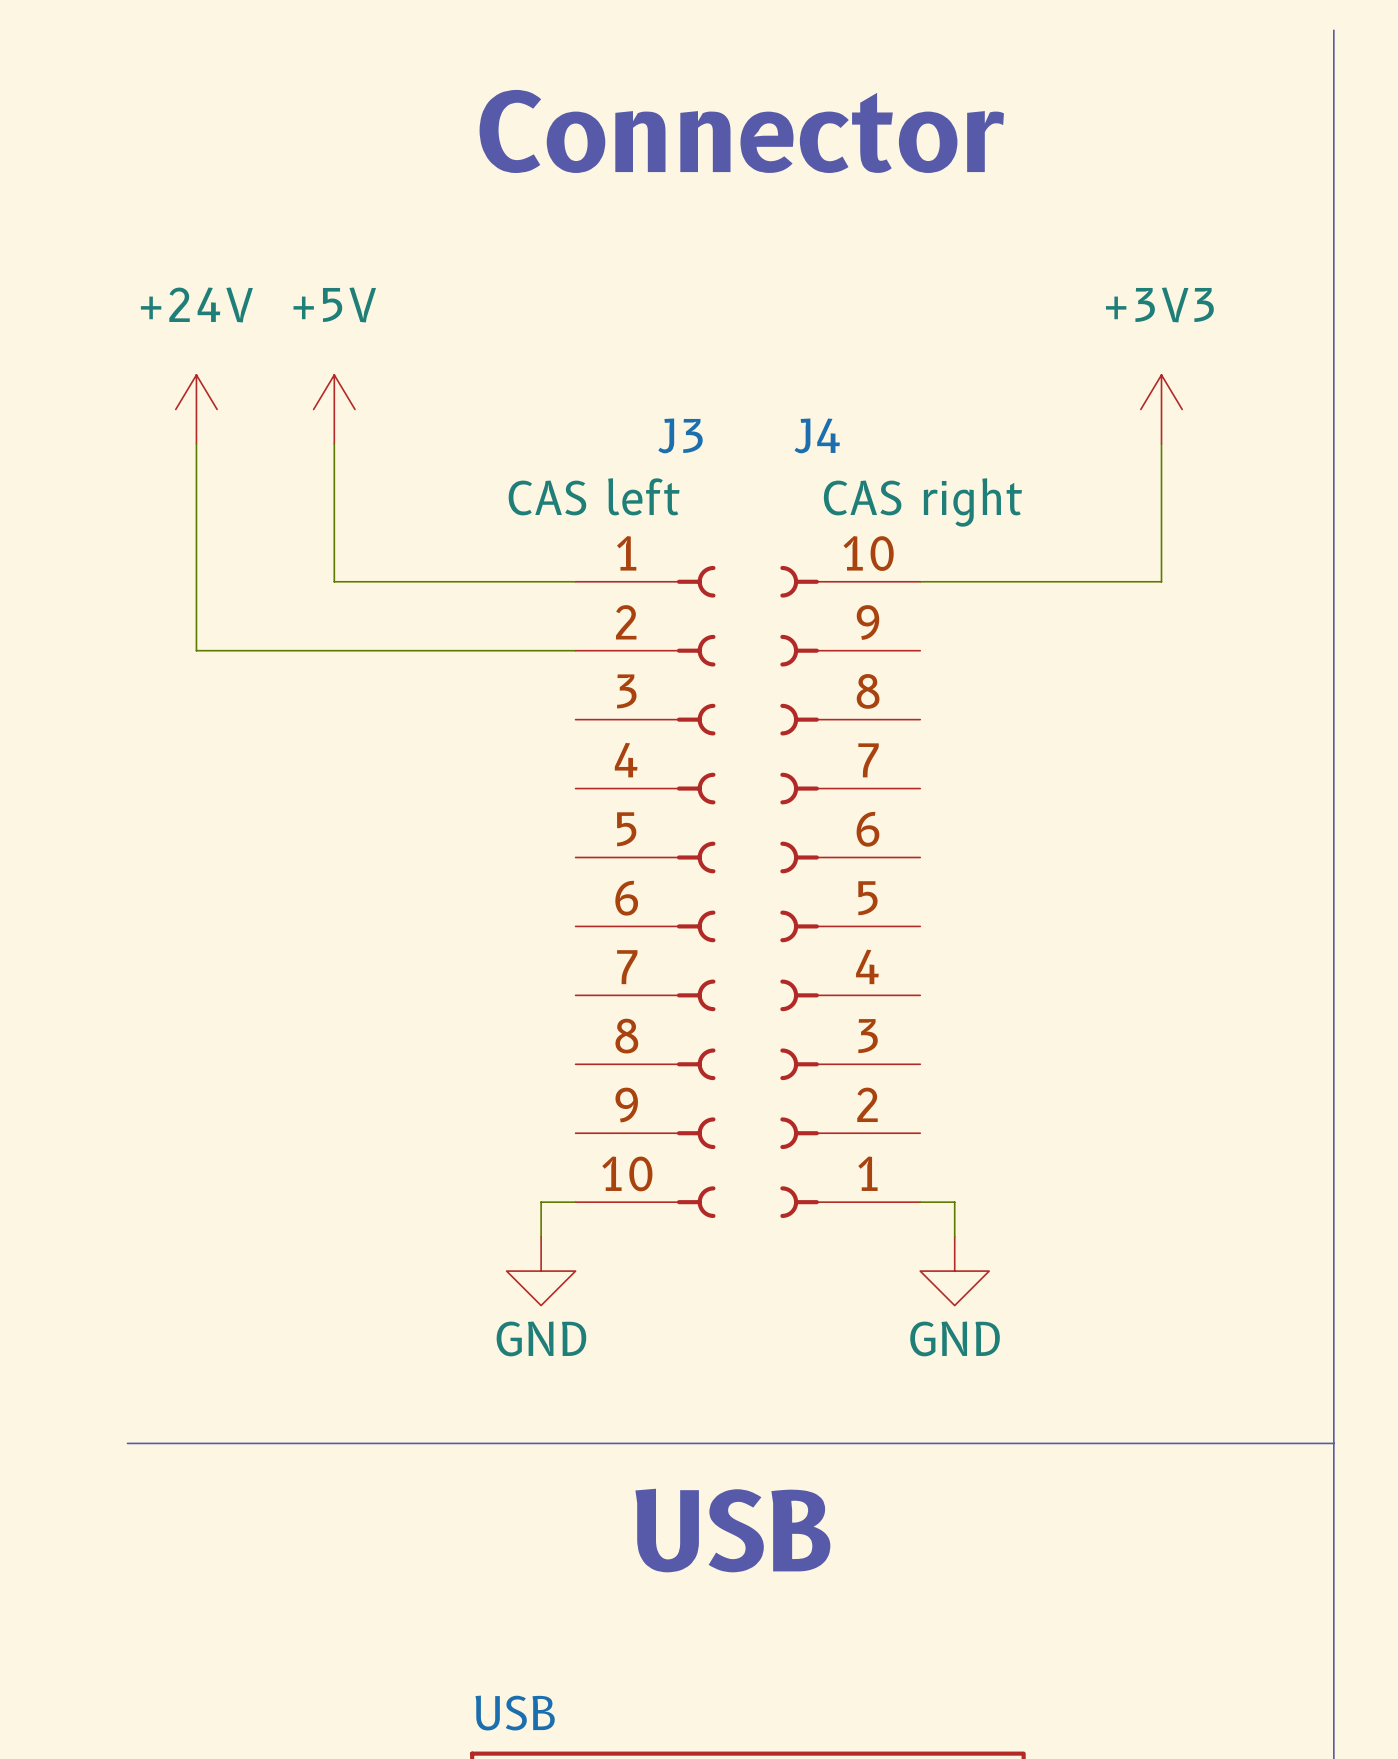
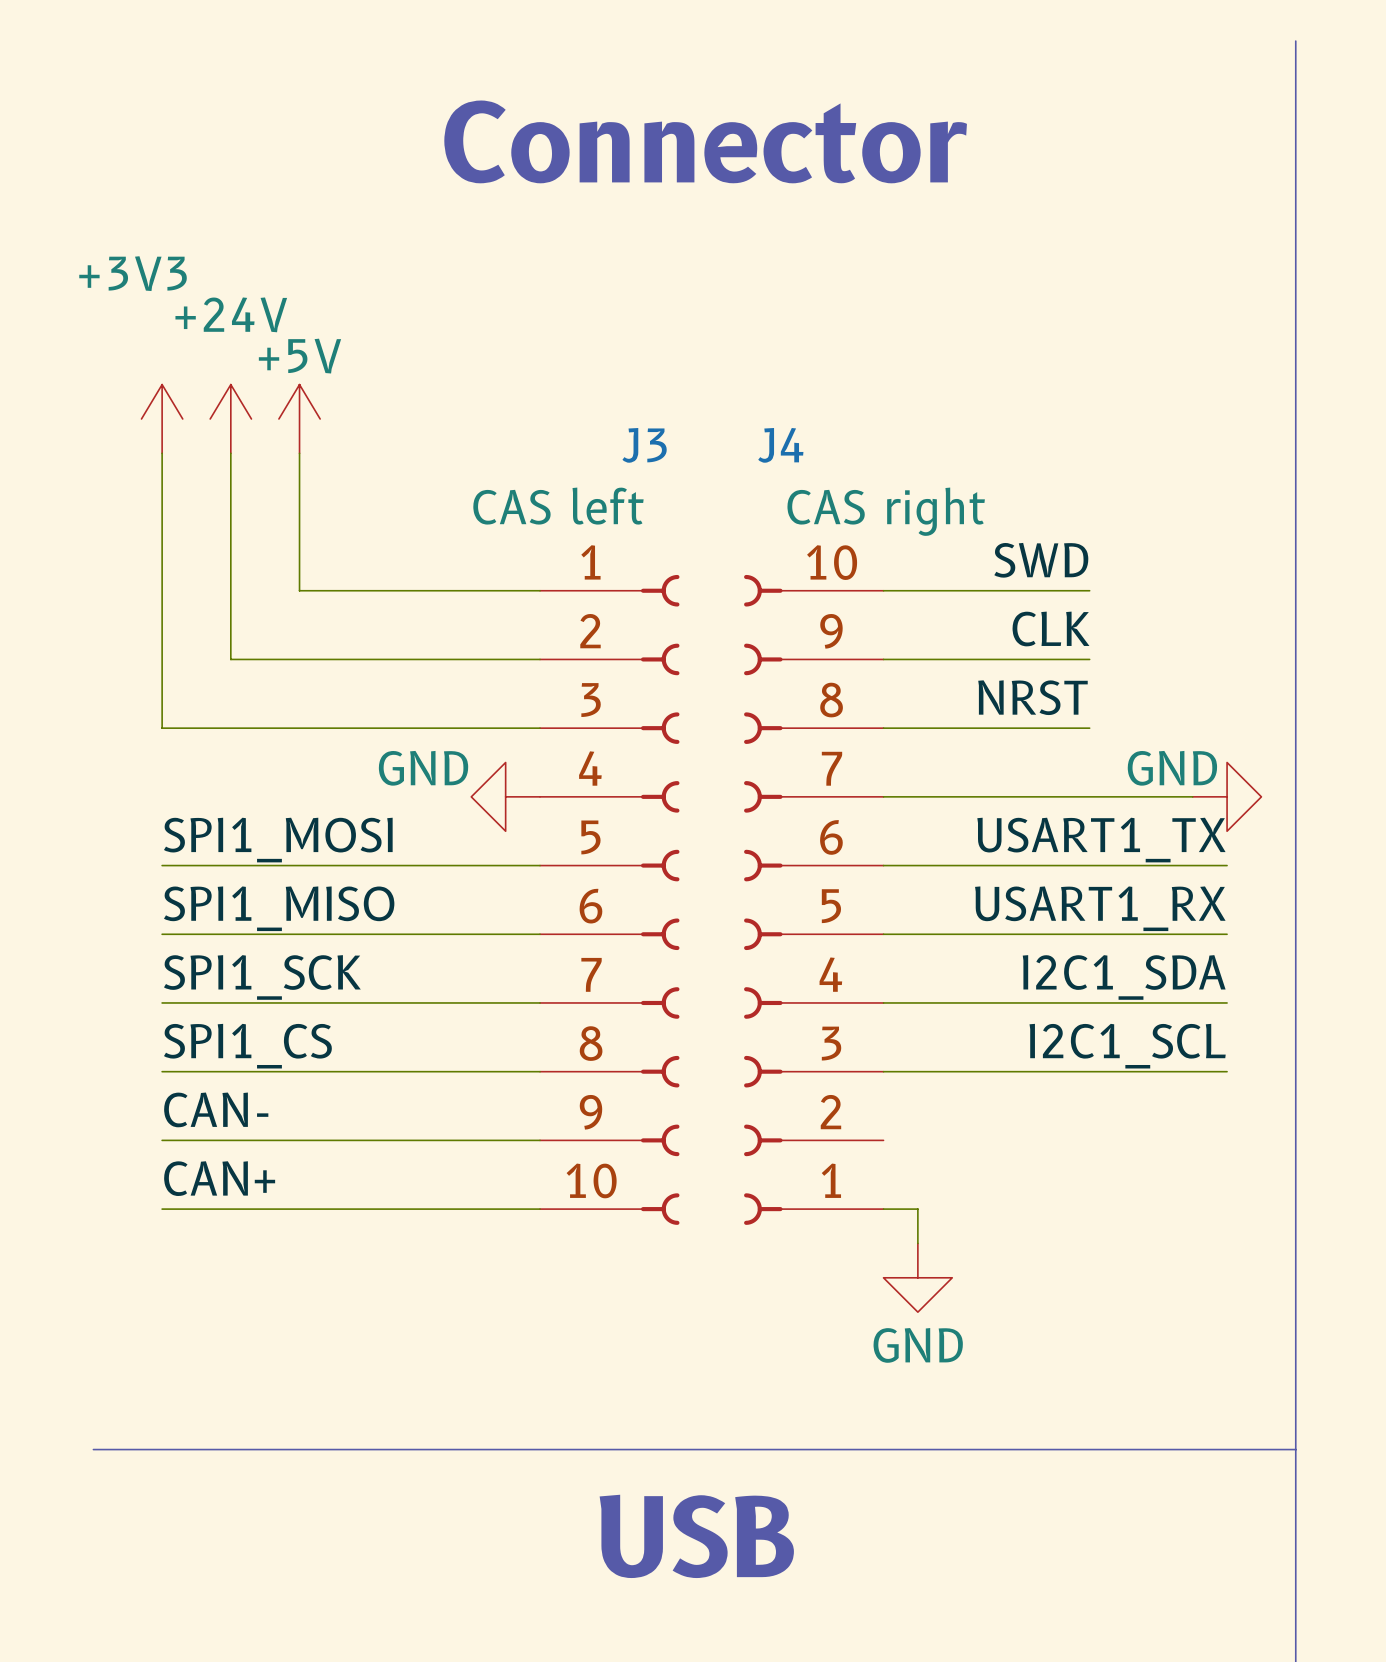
power symbol text position: +5V (334, 304) -> +5V (299, 356)
power symbol: +24V (196, 409) -> +3V3 (162, 418)
power symbol: none -> +24V (230, 418)
power symbol: +3V3 (1161, 409) -> none
wire: (1161, 443) (1161, 581) (1127, 581) -> none
label: none -> SWD (1041, 560)
label: none -> CLK (1050, 628)
wire: (196, 650) (265, 650) -> (230, 453) (230, 659)
wire: none -> (162, 659) (162, 728) (540, 728)
wire: none -> (883, 659) (1089, 659)
label: none -> NRST (1032, 697)
wire: none -> (883, 728) (1089, 728)
power symbol: none -> GND (505, 796)
wire: none -> (883, 796) (1192, 796)
power symbol: none -> GND (1227, 796)
label: none -> SPI1_MOSI (278, 840)
label: none -> USART1_TX (1101, 840)
wire: none -> (162, 865) (540, 865)
wire: none -> (883, 865) (1227, 865)
label: none -> SPI1_MISO (279, 908)
label: none -> USART1_RX (1100, 908)
wire: none -> (162, 934) (540, 934)
wire: none -> (883, 934) (1227, 934)
label: none -> SPI1_SCK (262, 977)
label: none -> I2C1_SDA (1124, 977)
wire: none -> (162, 1002) (540, 1002)
wire: none -> (883, 1002) (1227, 1002)
label: none -> SPI1_CS (247, 1046)
label: none -> I2C1_SCL (1127, 1046)
wire: none -> (162, 1071) (540, 1071)
wire: none -> (883, 1071) (1227, 1071)
label: none -> CAN- (216, 1109)
wire: none -> (162, 1140) (540, 1140)
label: none -> CAN+ (219, 1178)
wire: (541, 1202) (541, 1236) -> (505, 1209) (162, 1209)
power symbol: GND (541, 1271) -> none

